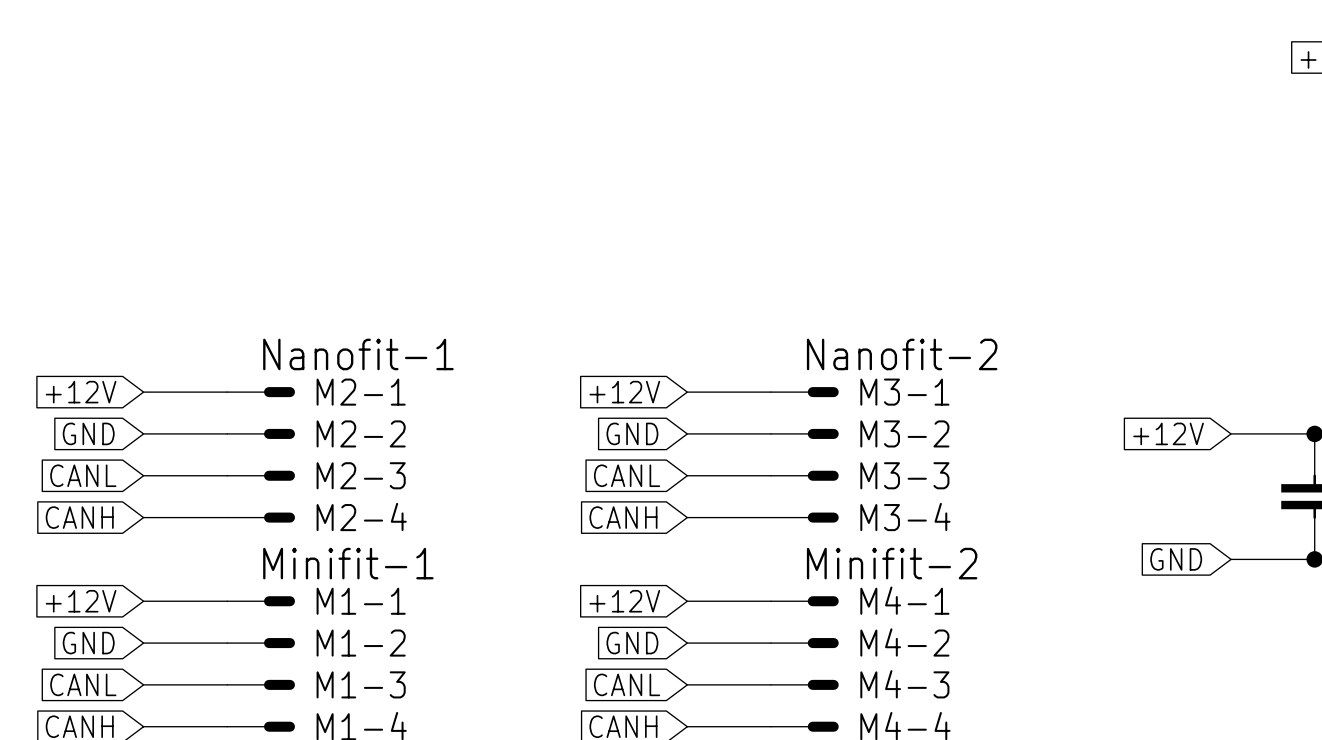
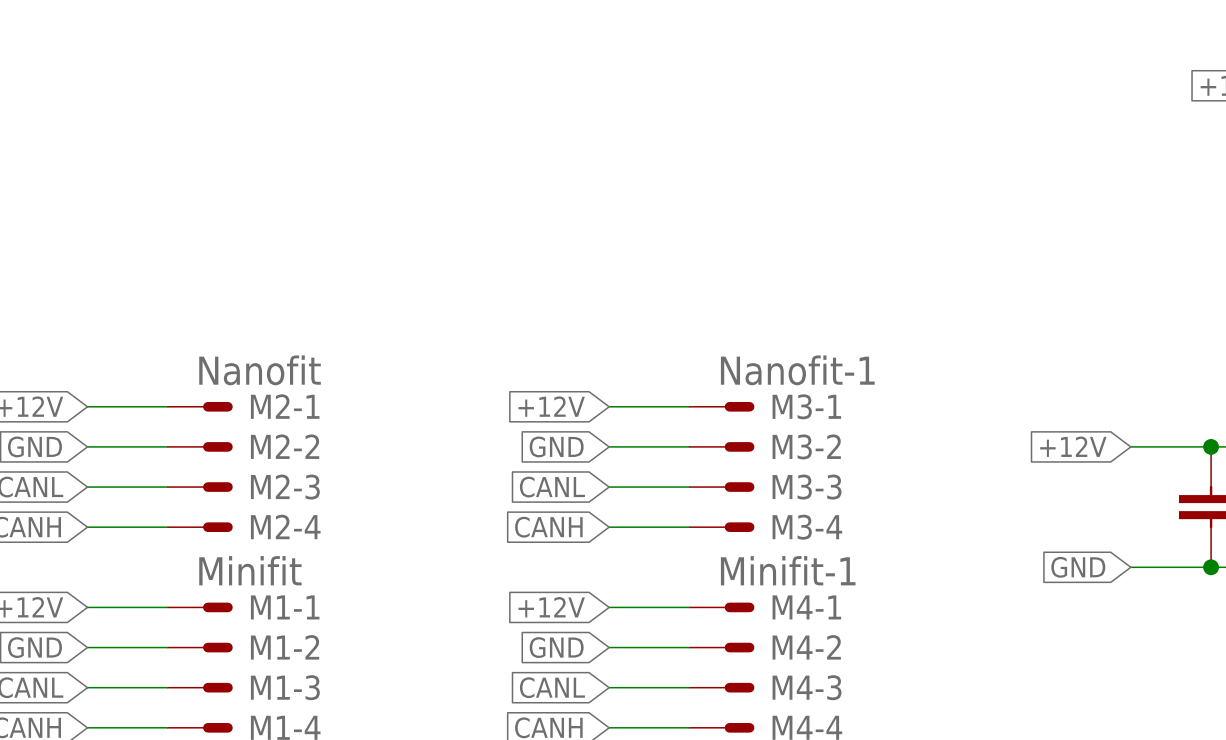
M2-1 value: Nanofit-1 (358, 354) -> Nanofit (260, 370)
M3-1 value: Nanofit-2 (902, 354) -> Nanofit-1 (797, 370)
M1-1 value: Minifit-1 (348, 563) -> Minifit (250, 570)
M4-1 value: Minifit-2 (892, 563) -> Minifit-1 (788, 570)

